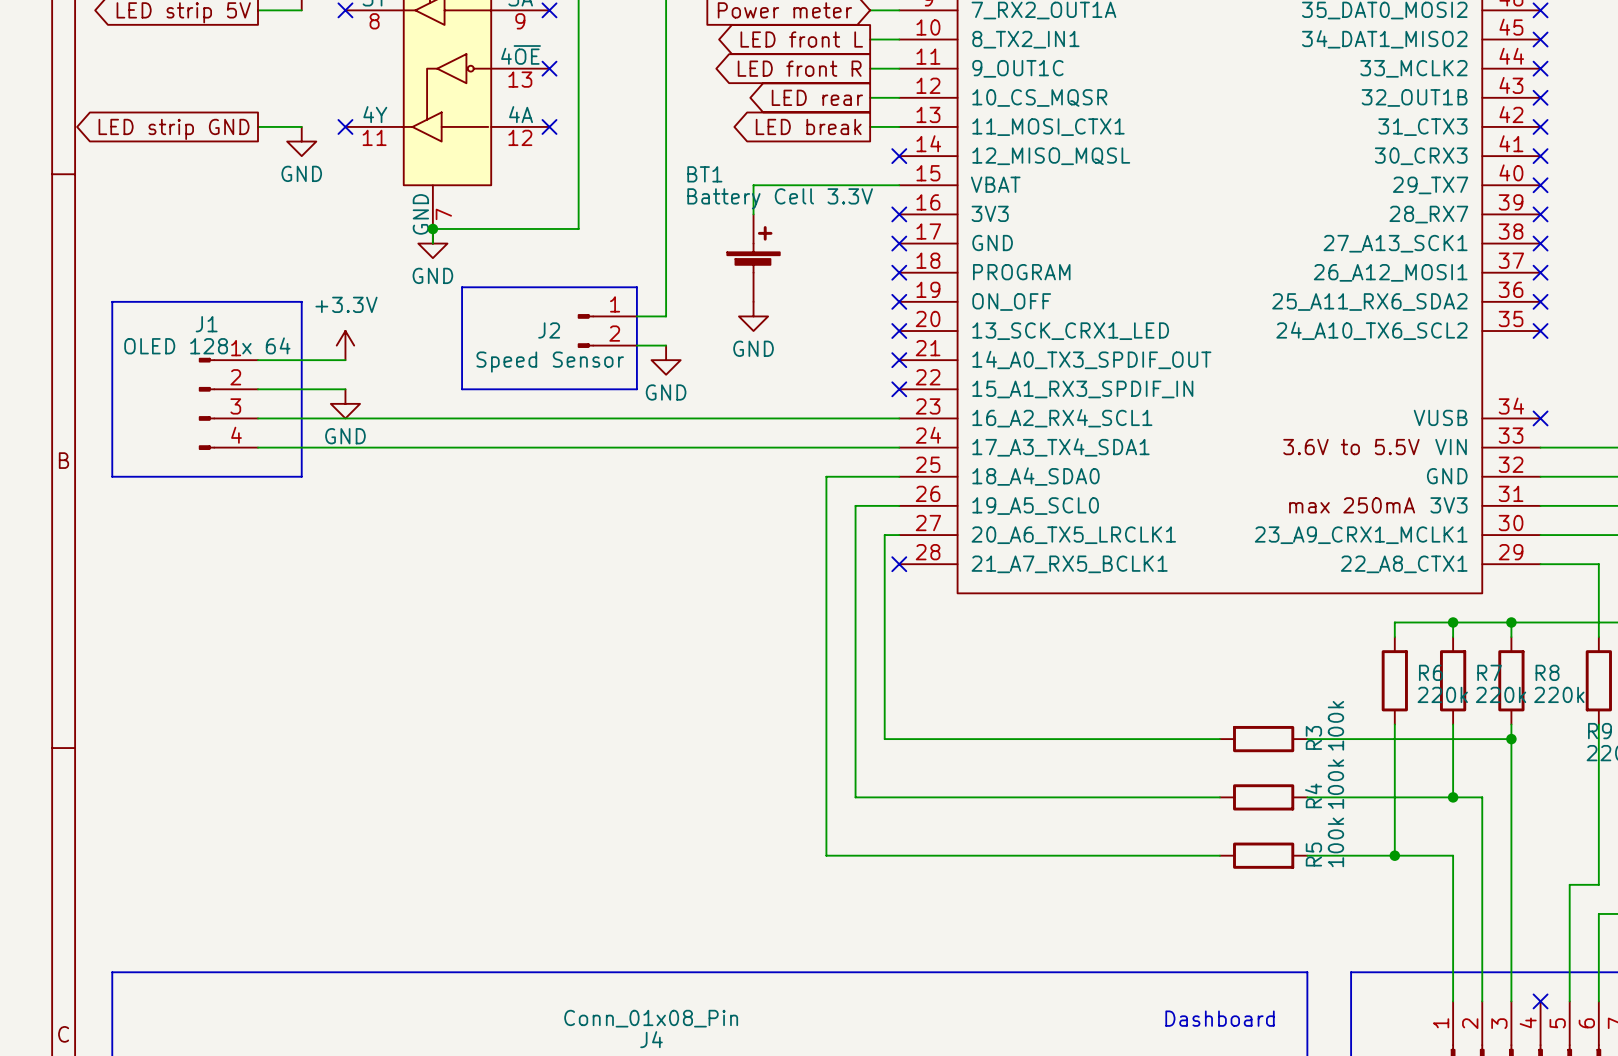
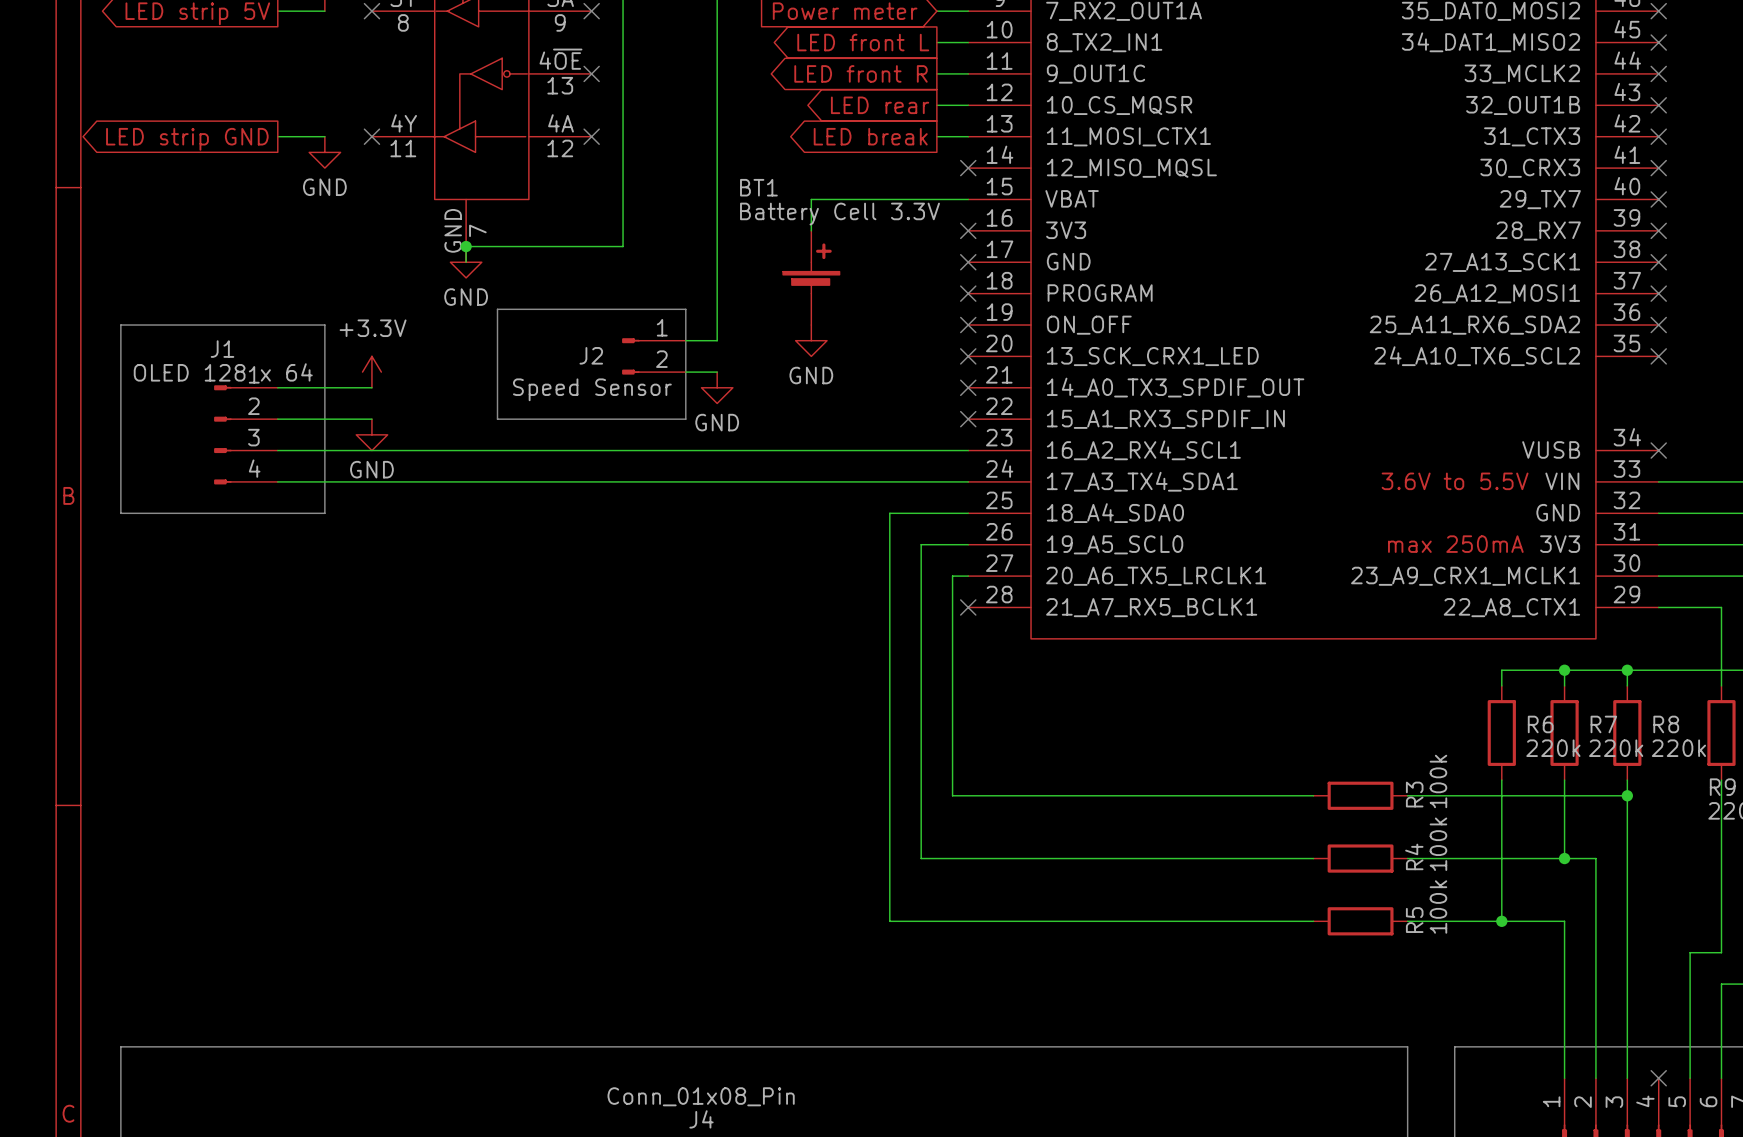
text: Dashboard (1220, 1018) -> none

